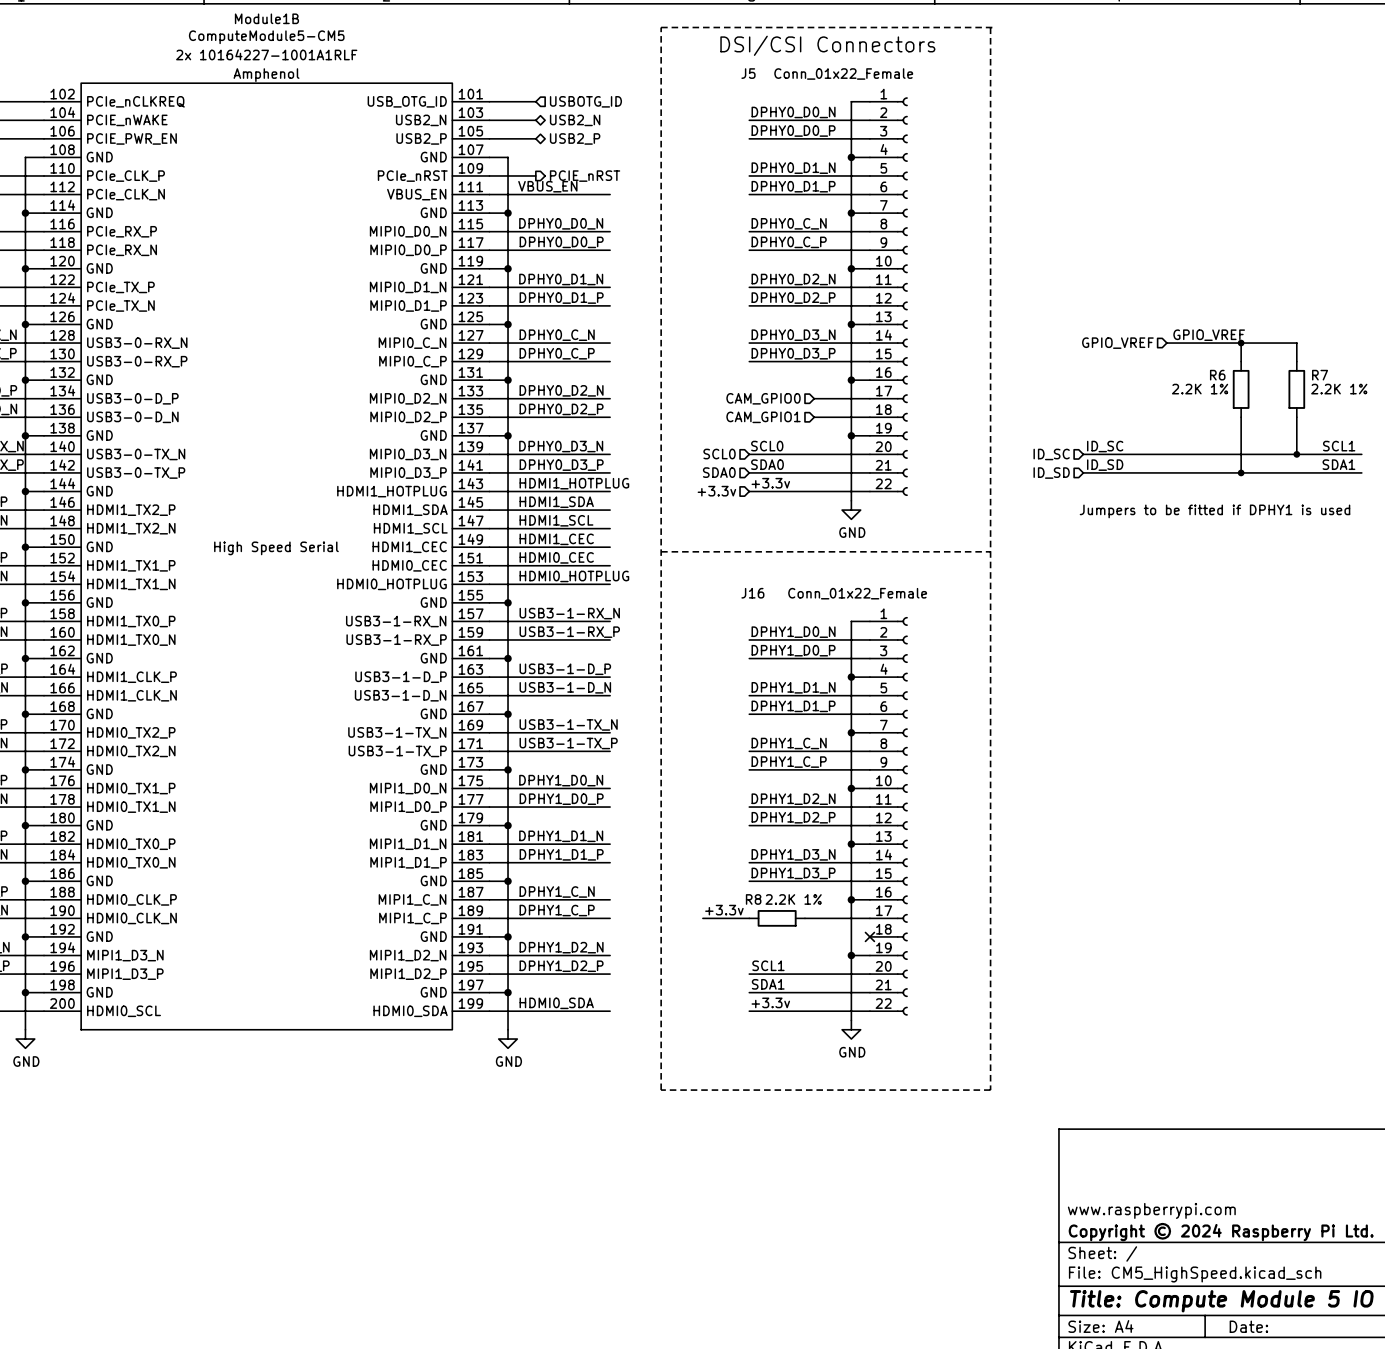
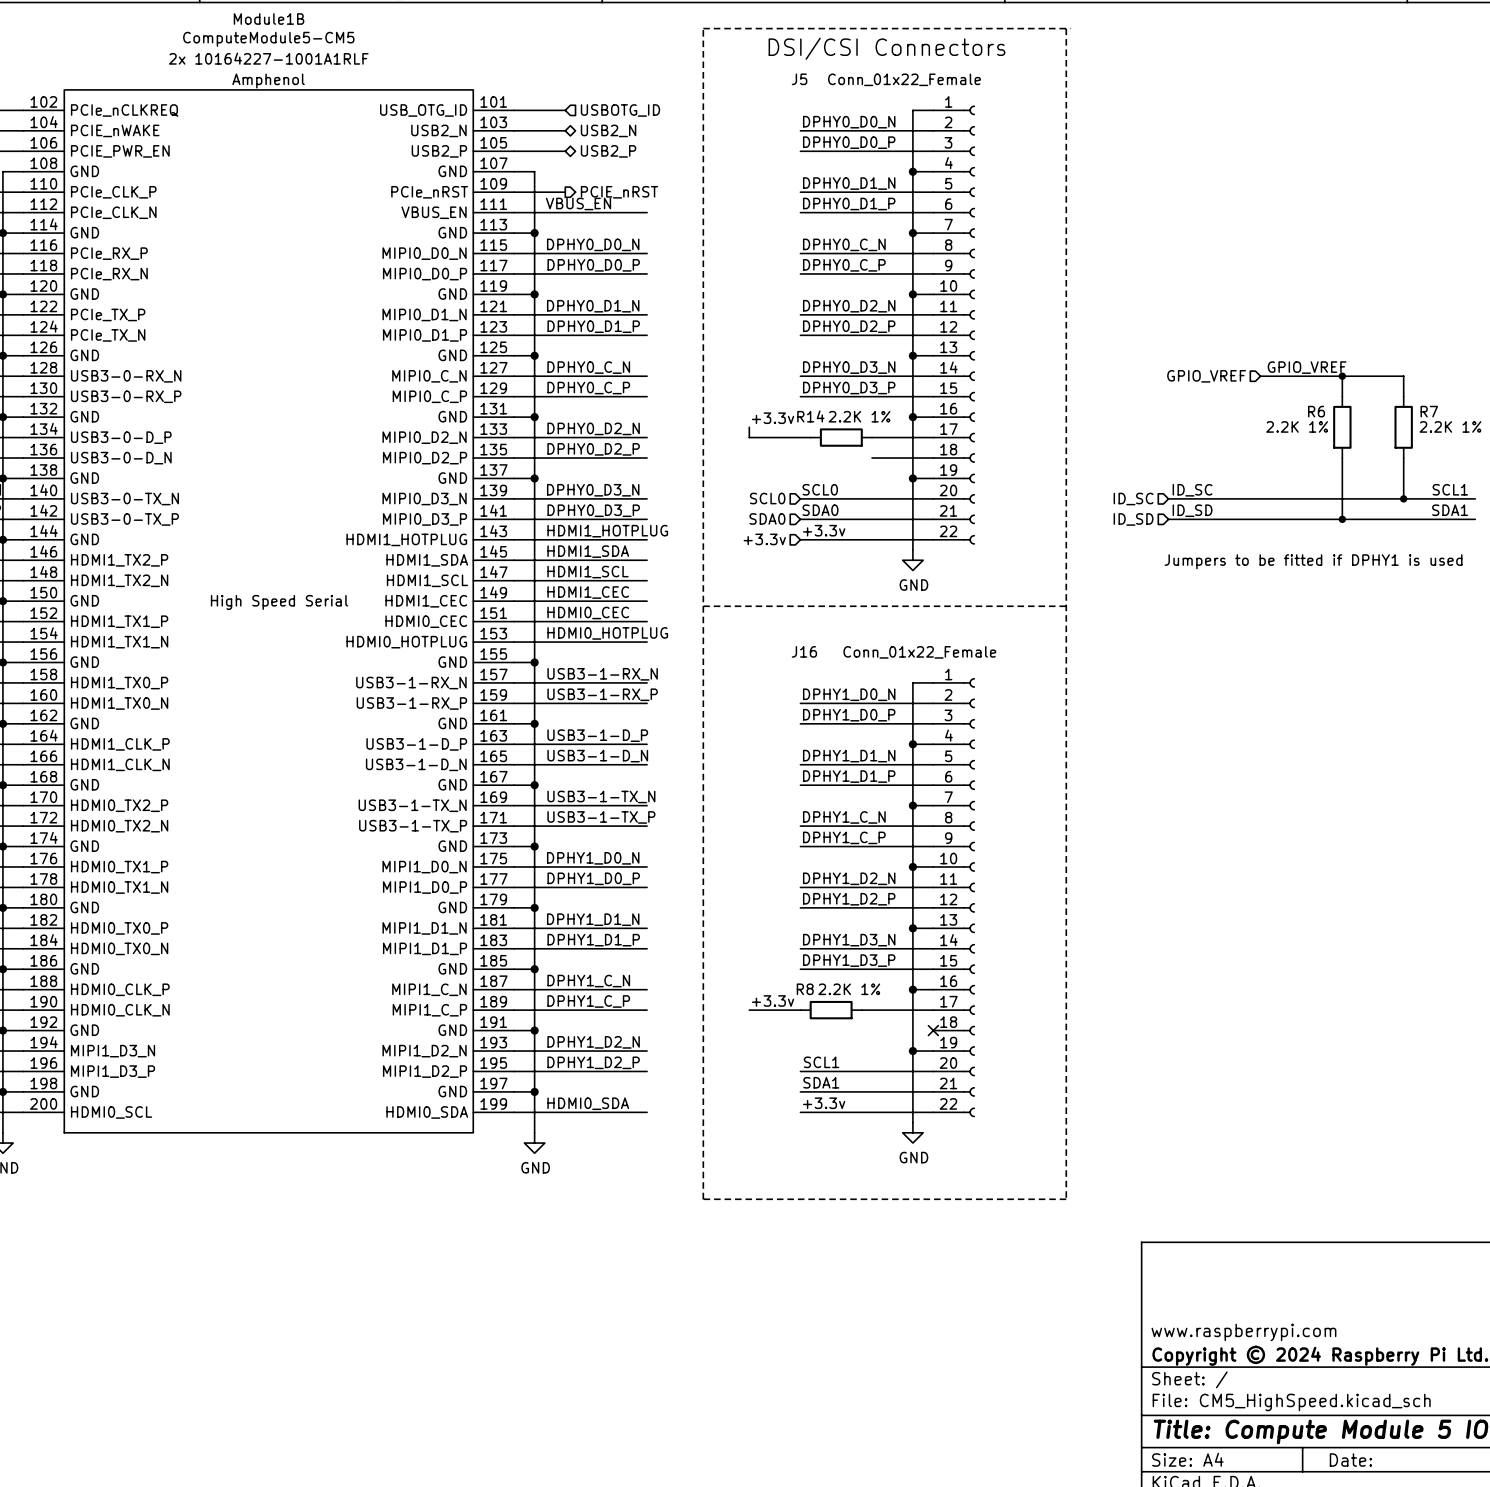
label: none -> +3.3v (773, 418)
wire: none -> (749, 427) (749, 437) (810, 437)
hierarchical label: CAM_GPIO0 (763, 398) -> none
R14: none -> 2.2K 1% (841, 437)
hierarchical label: CAM_GPIO1 (763, 417) -> none

